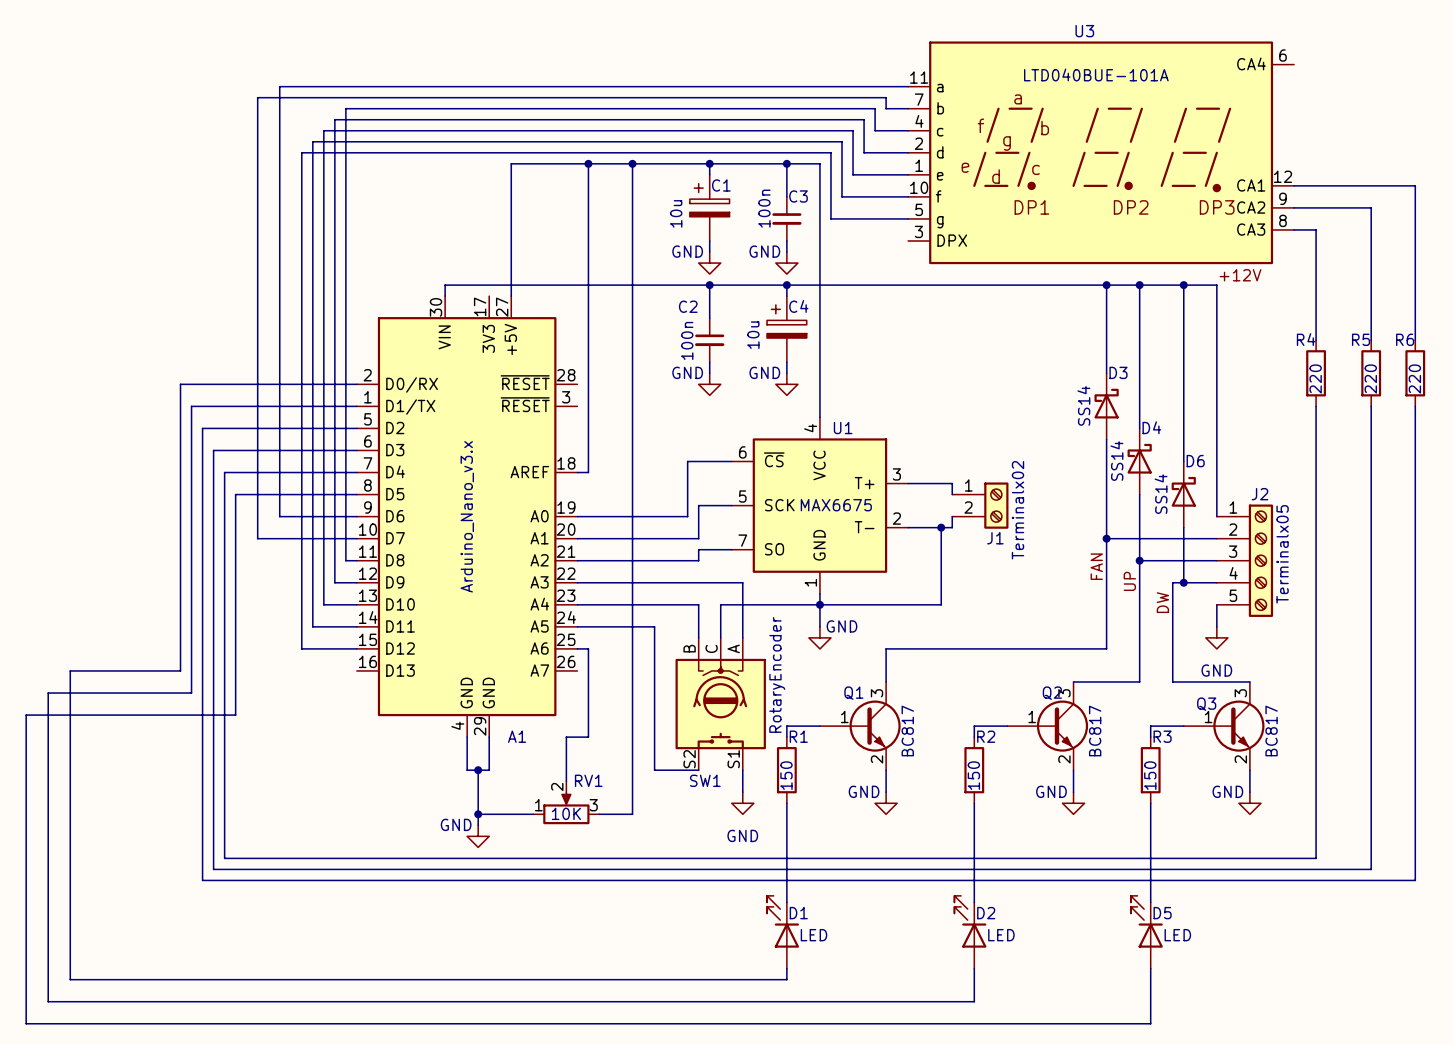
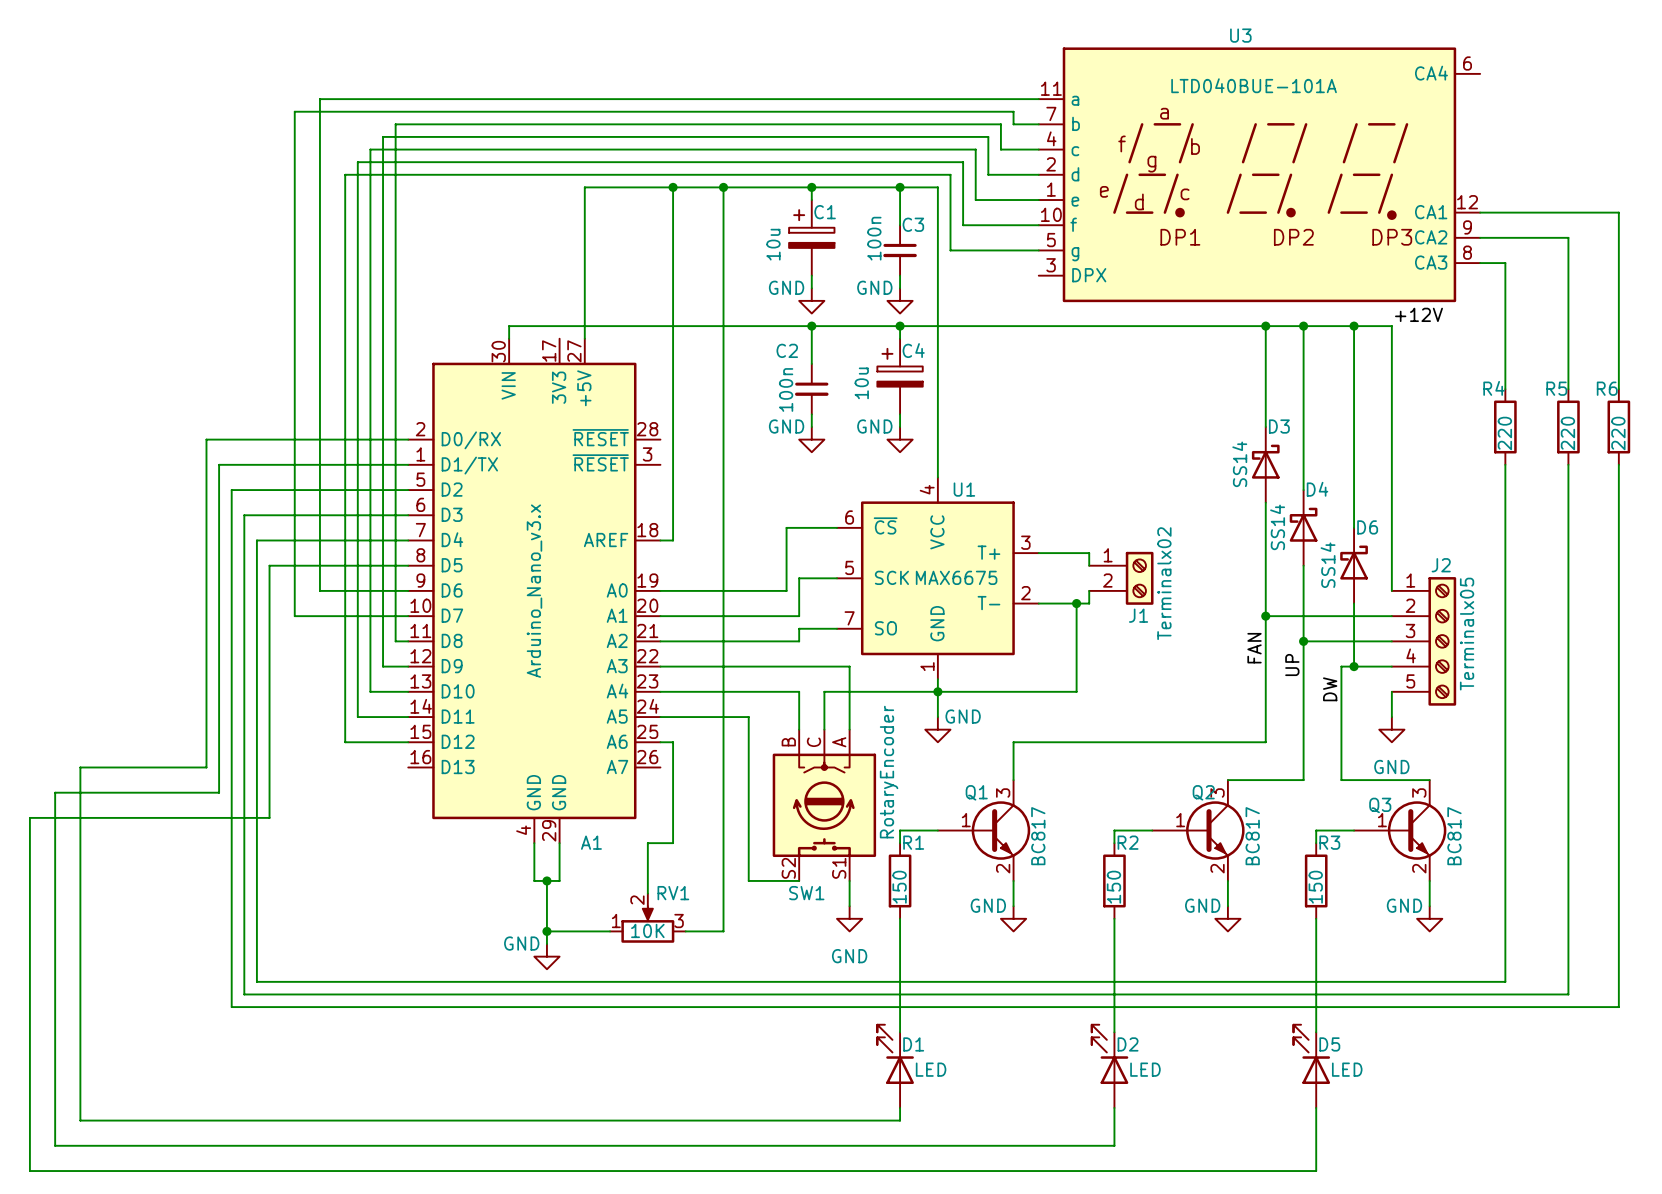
SW1 symbol: [675, 637, 766, 771] -> [772, 729, 877, 881]

